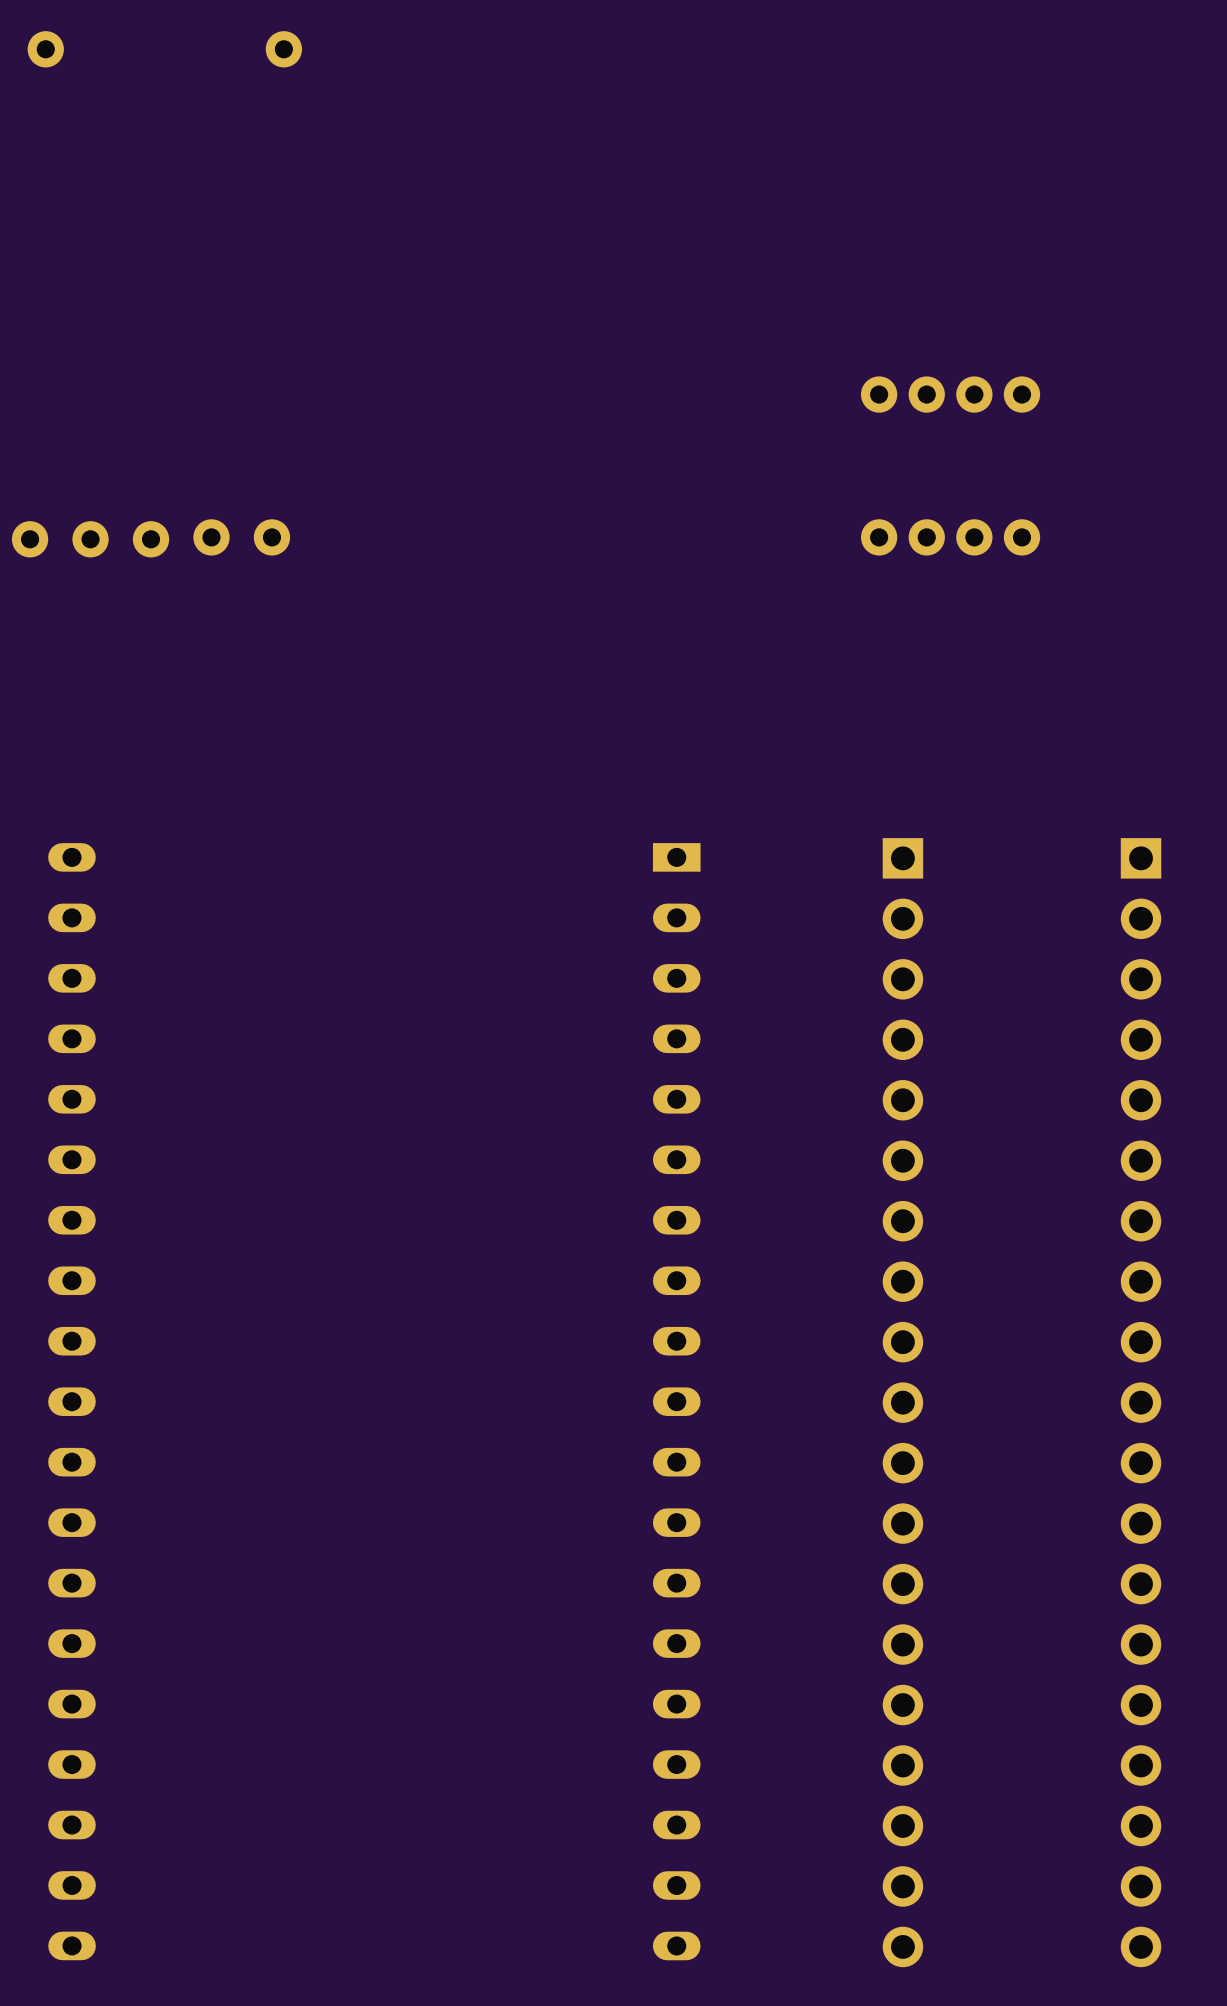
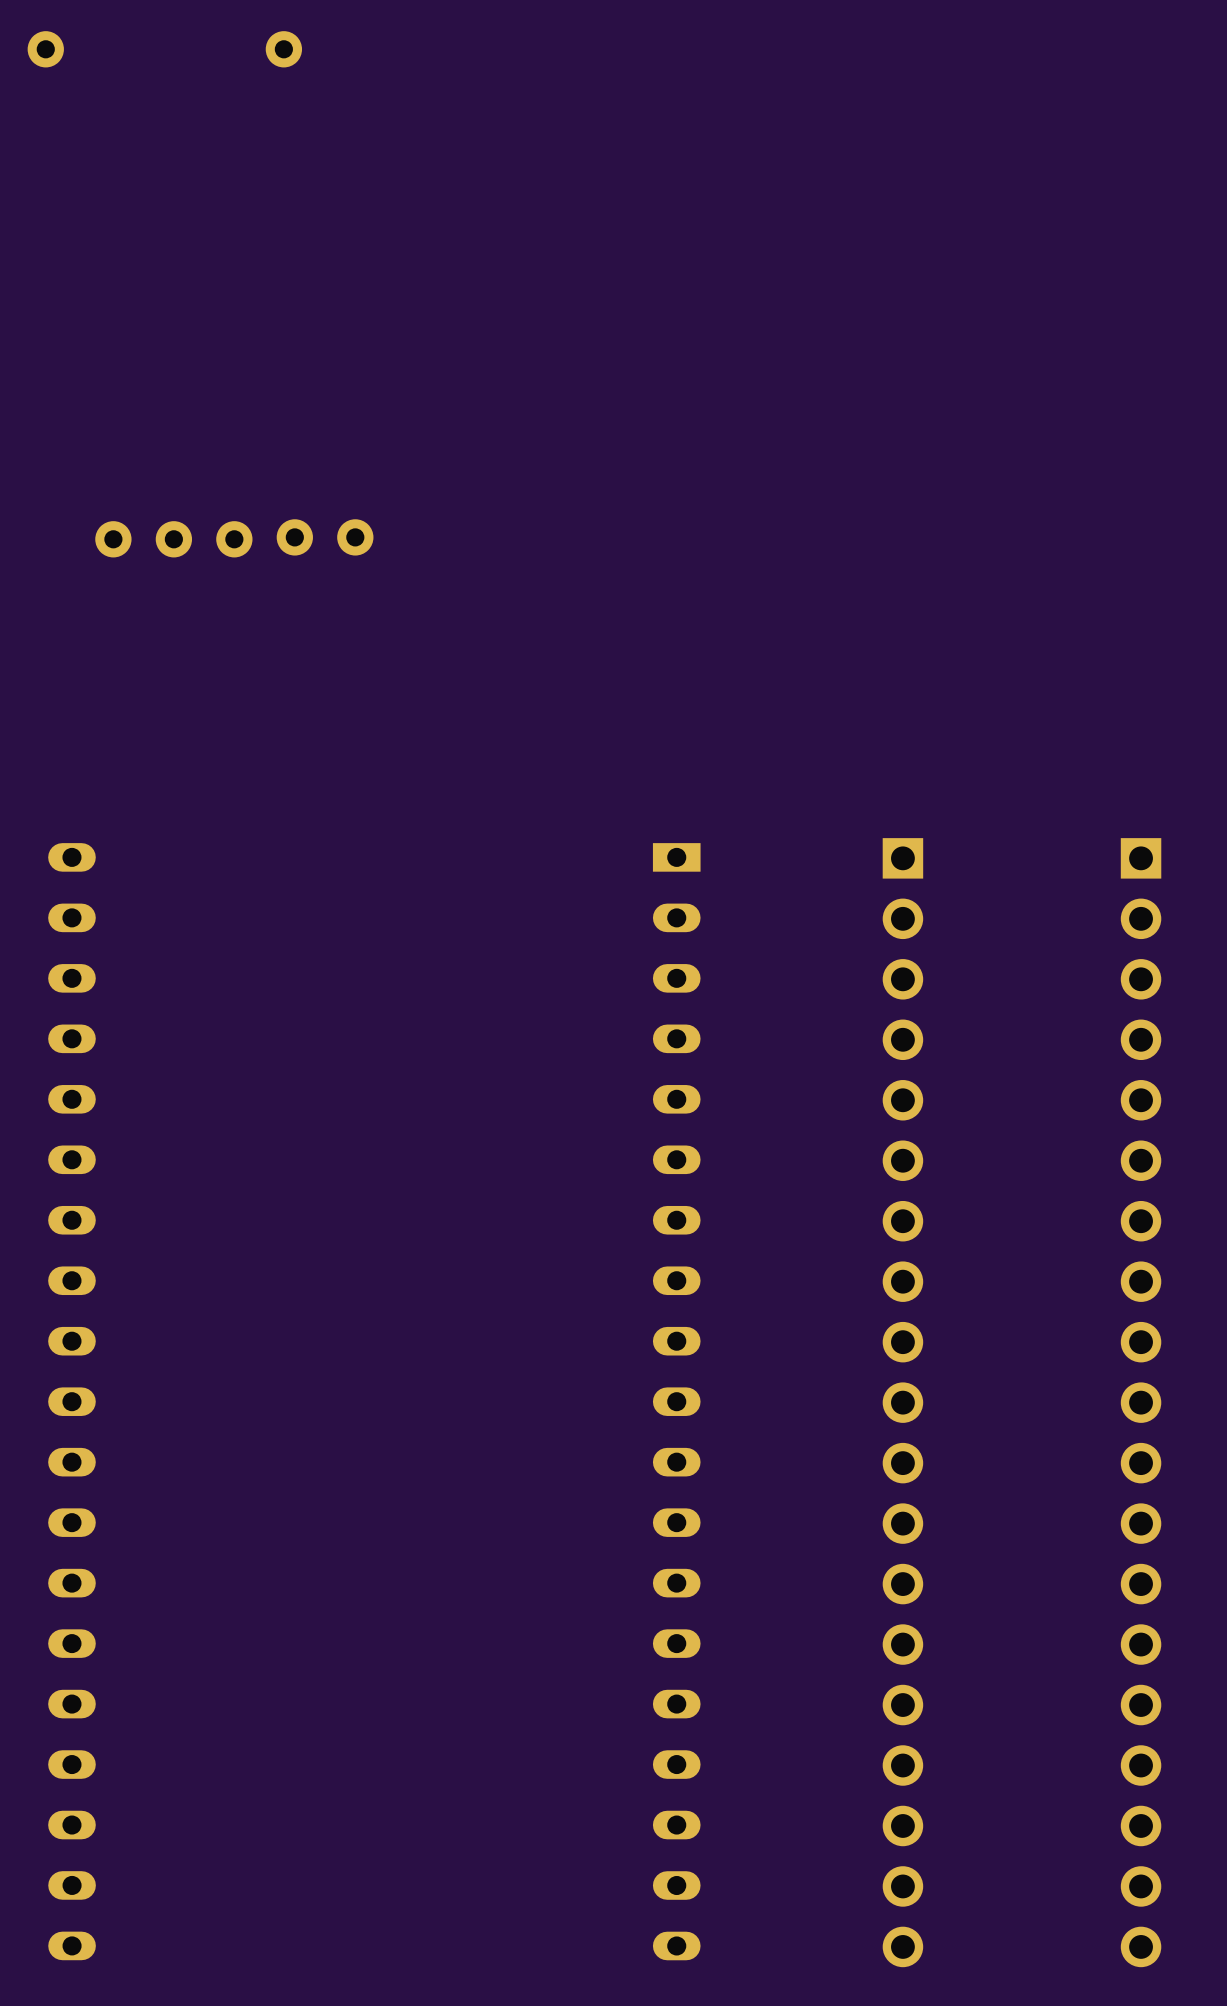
part: (950, 394) -> none
part: (950, 537) -> none
part position: (151, 538) -> (234, 538)

